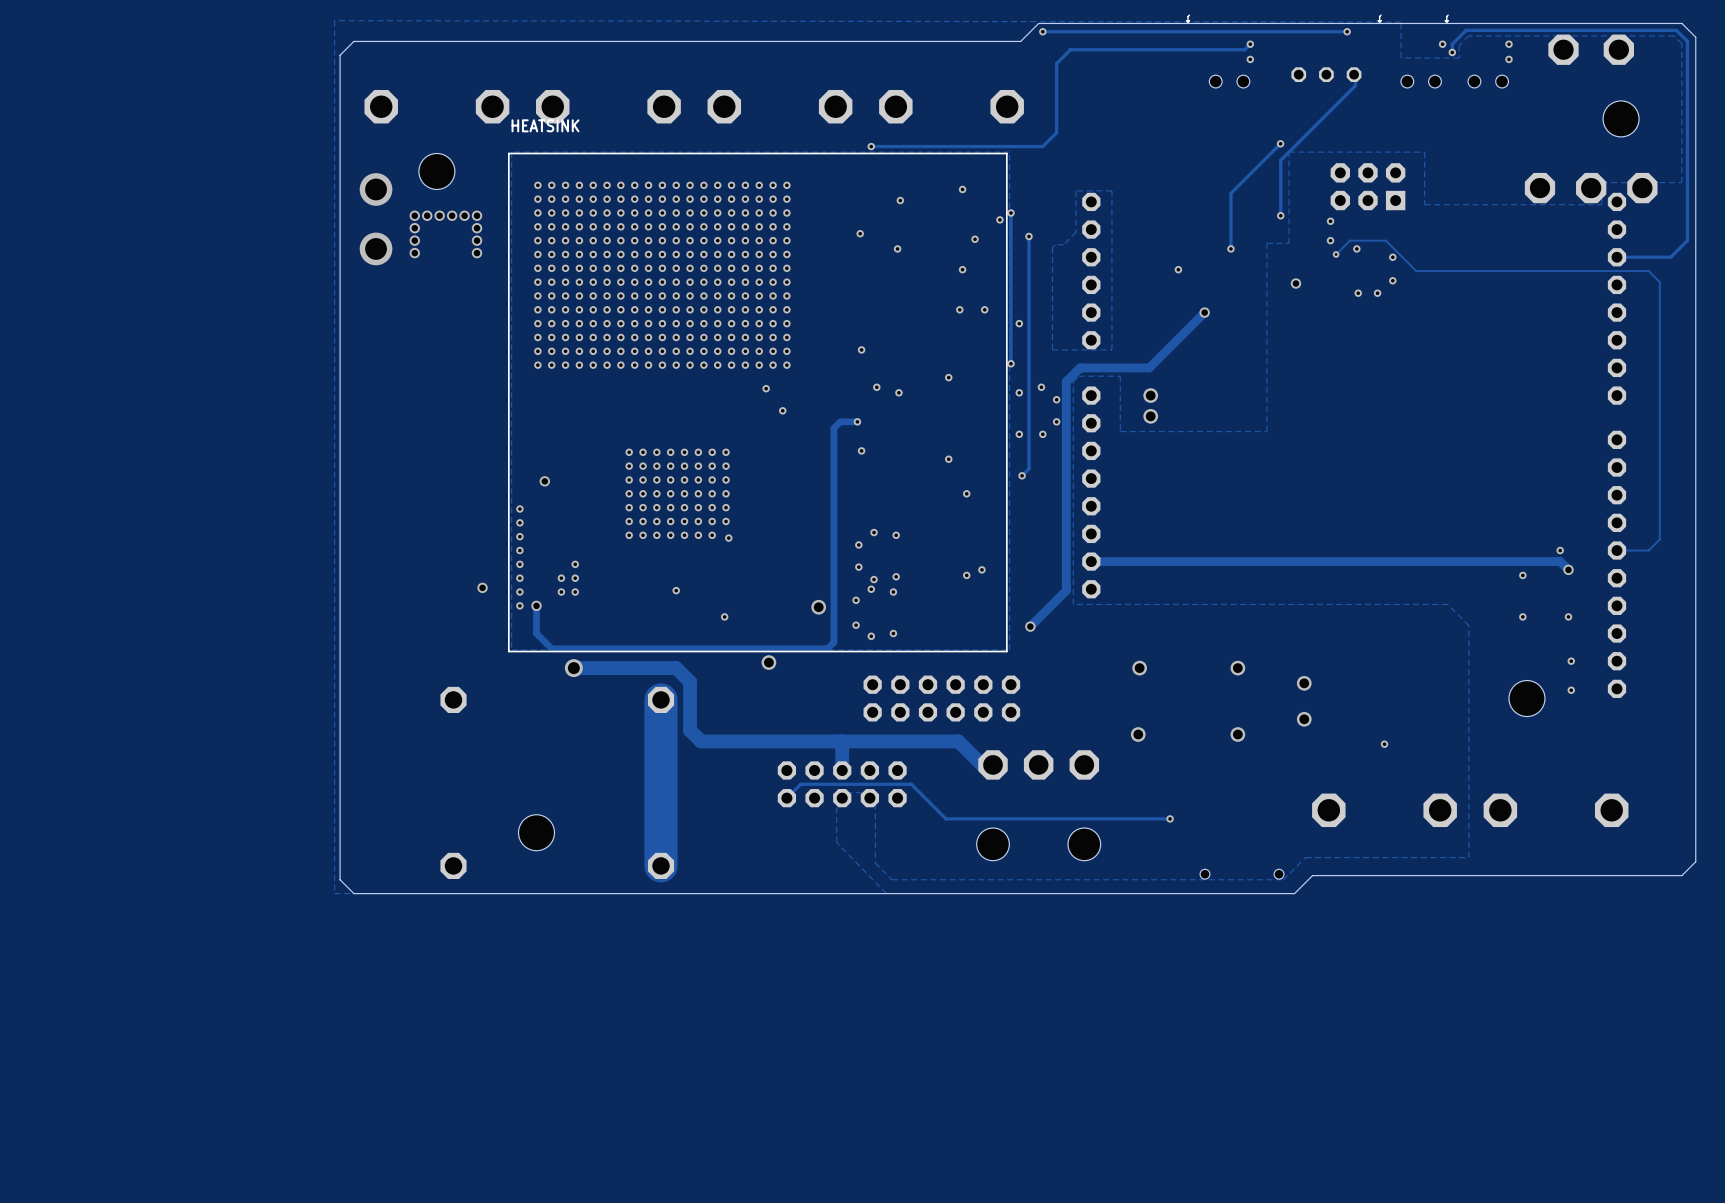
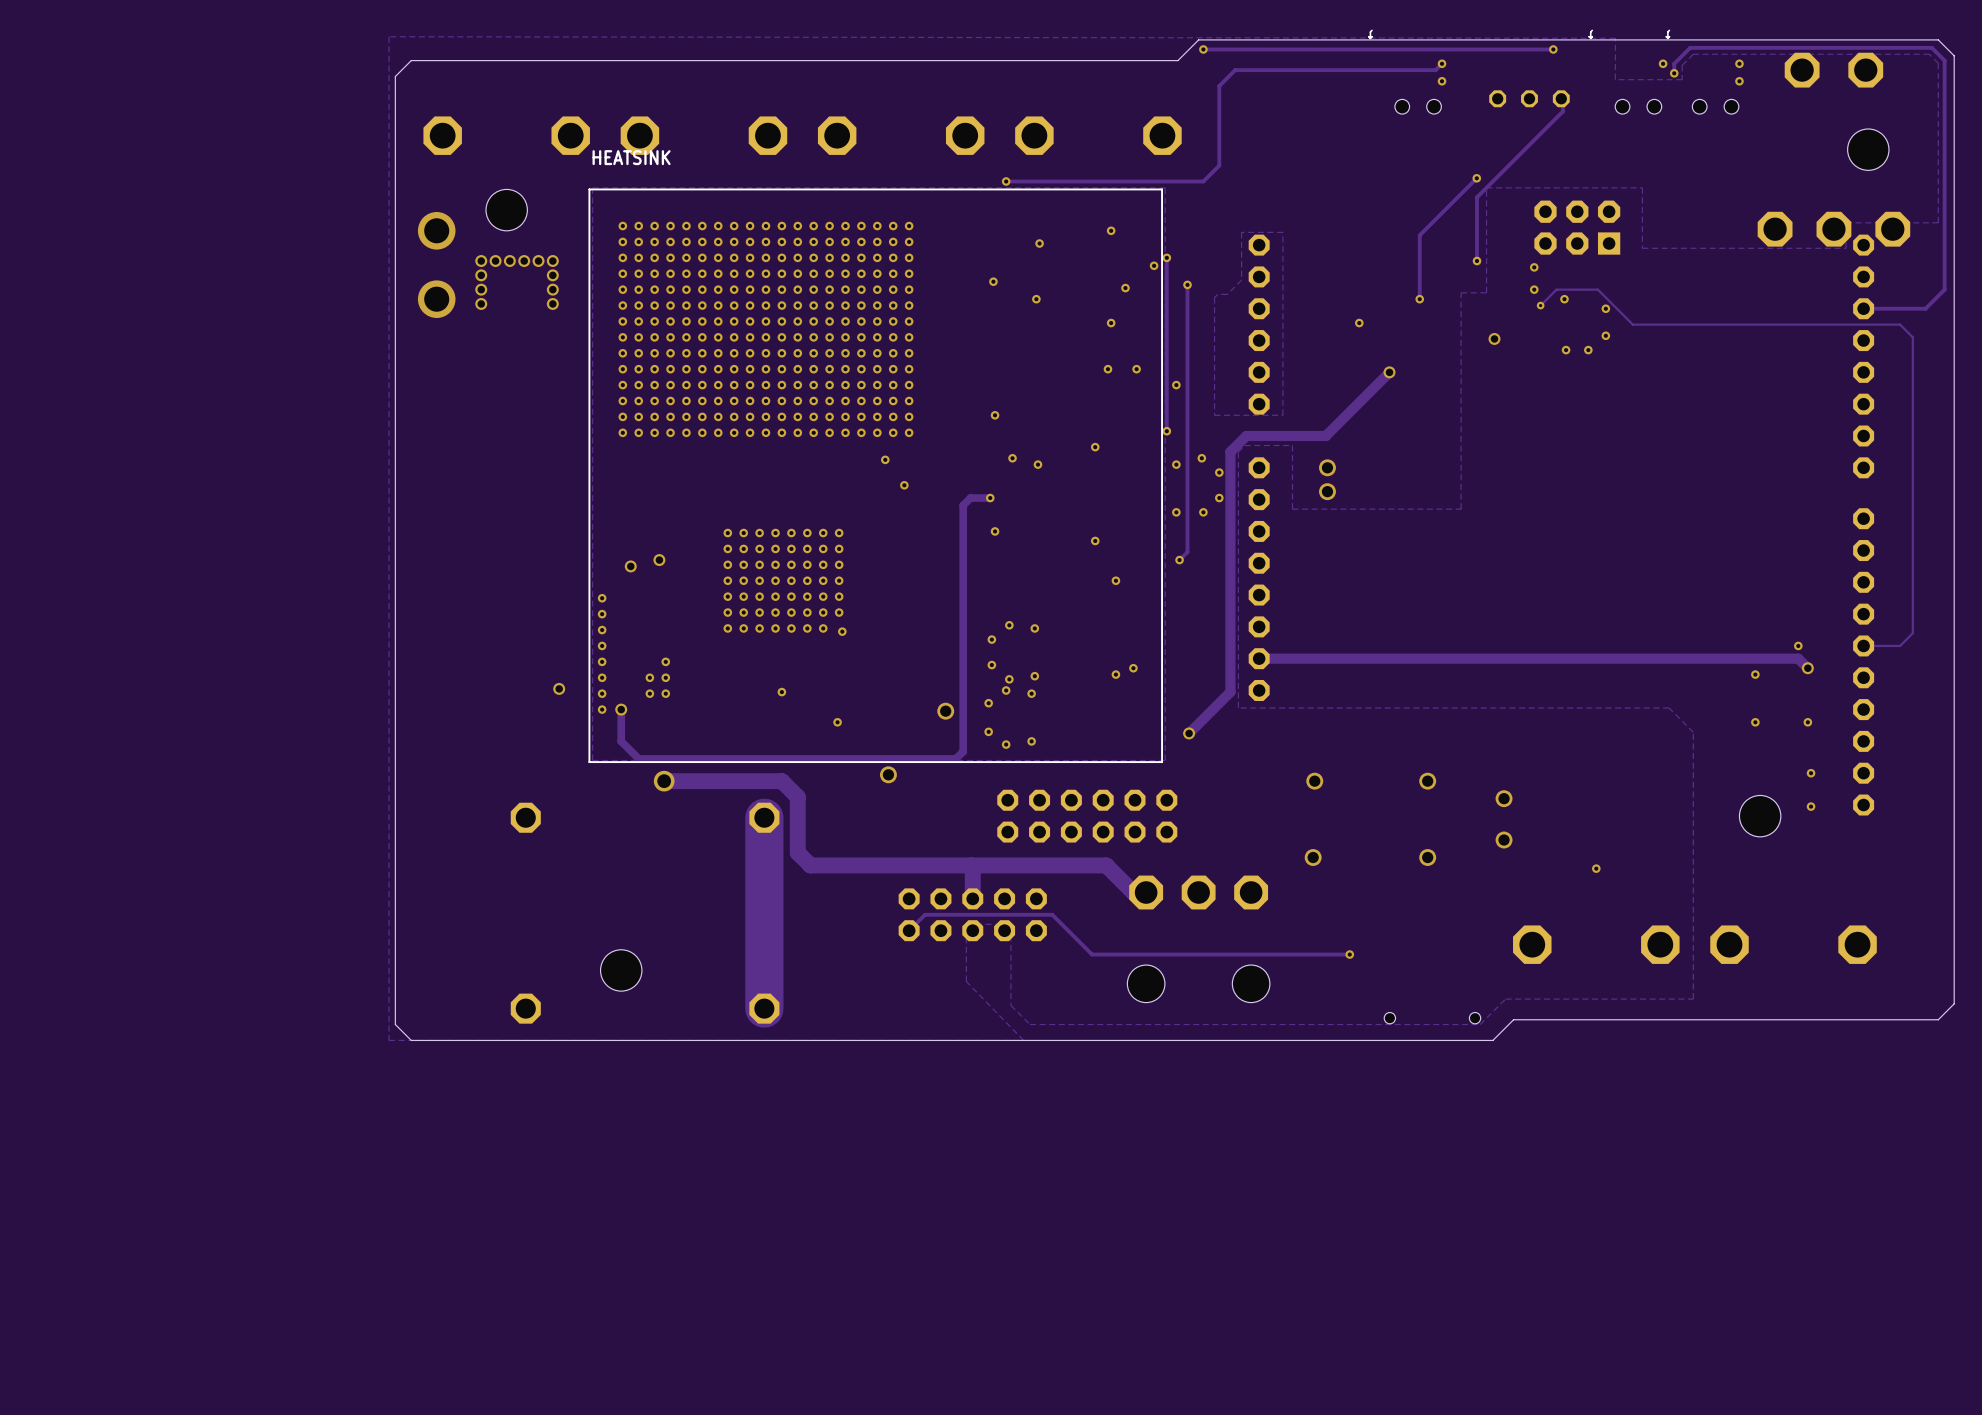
via: none -> (659, 560)

